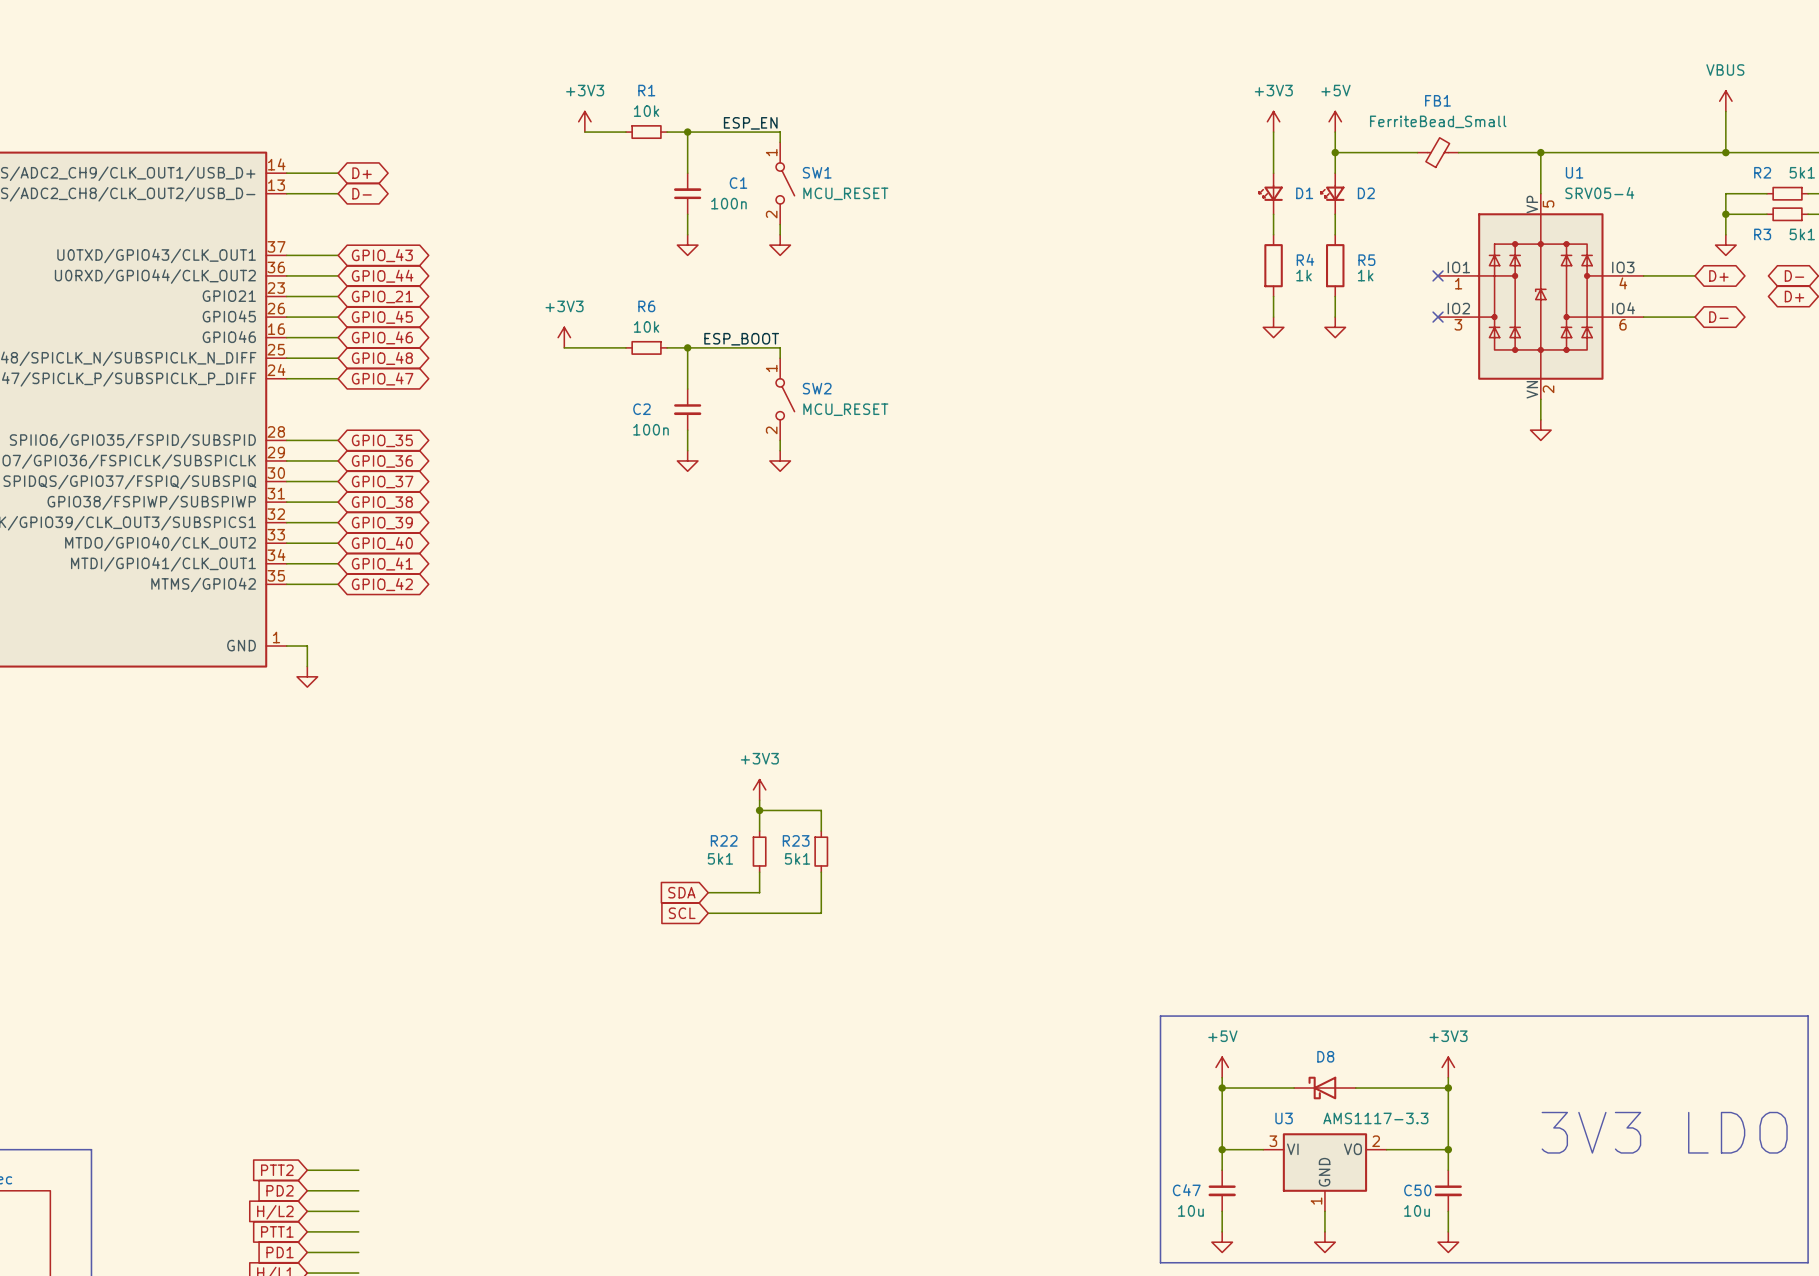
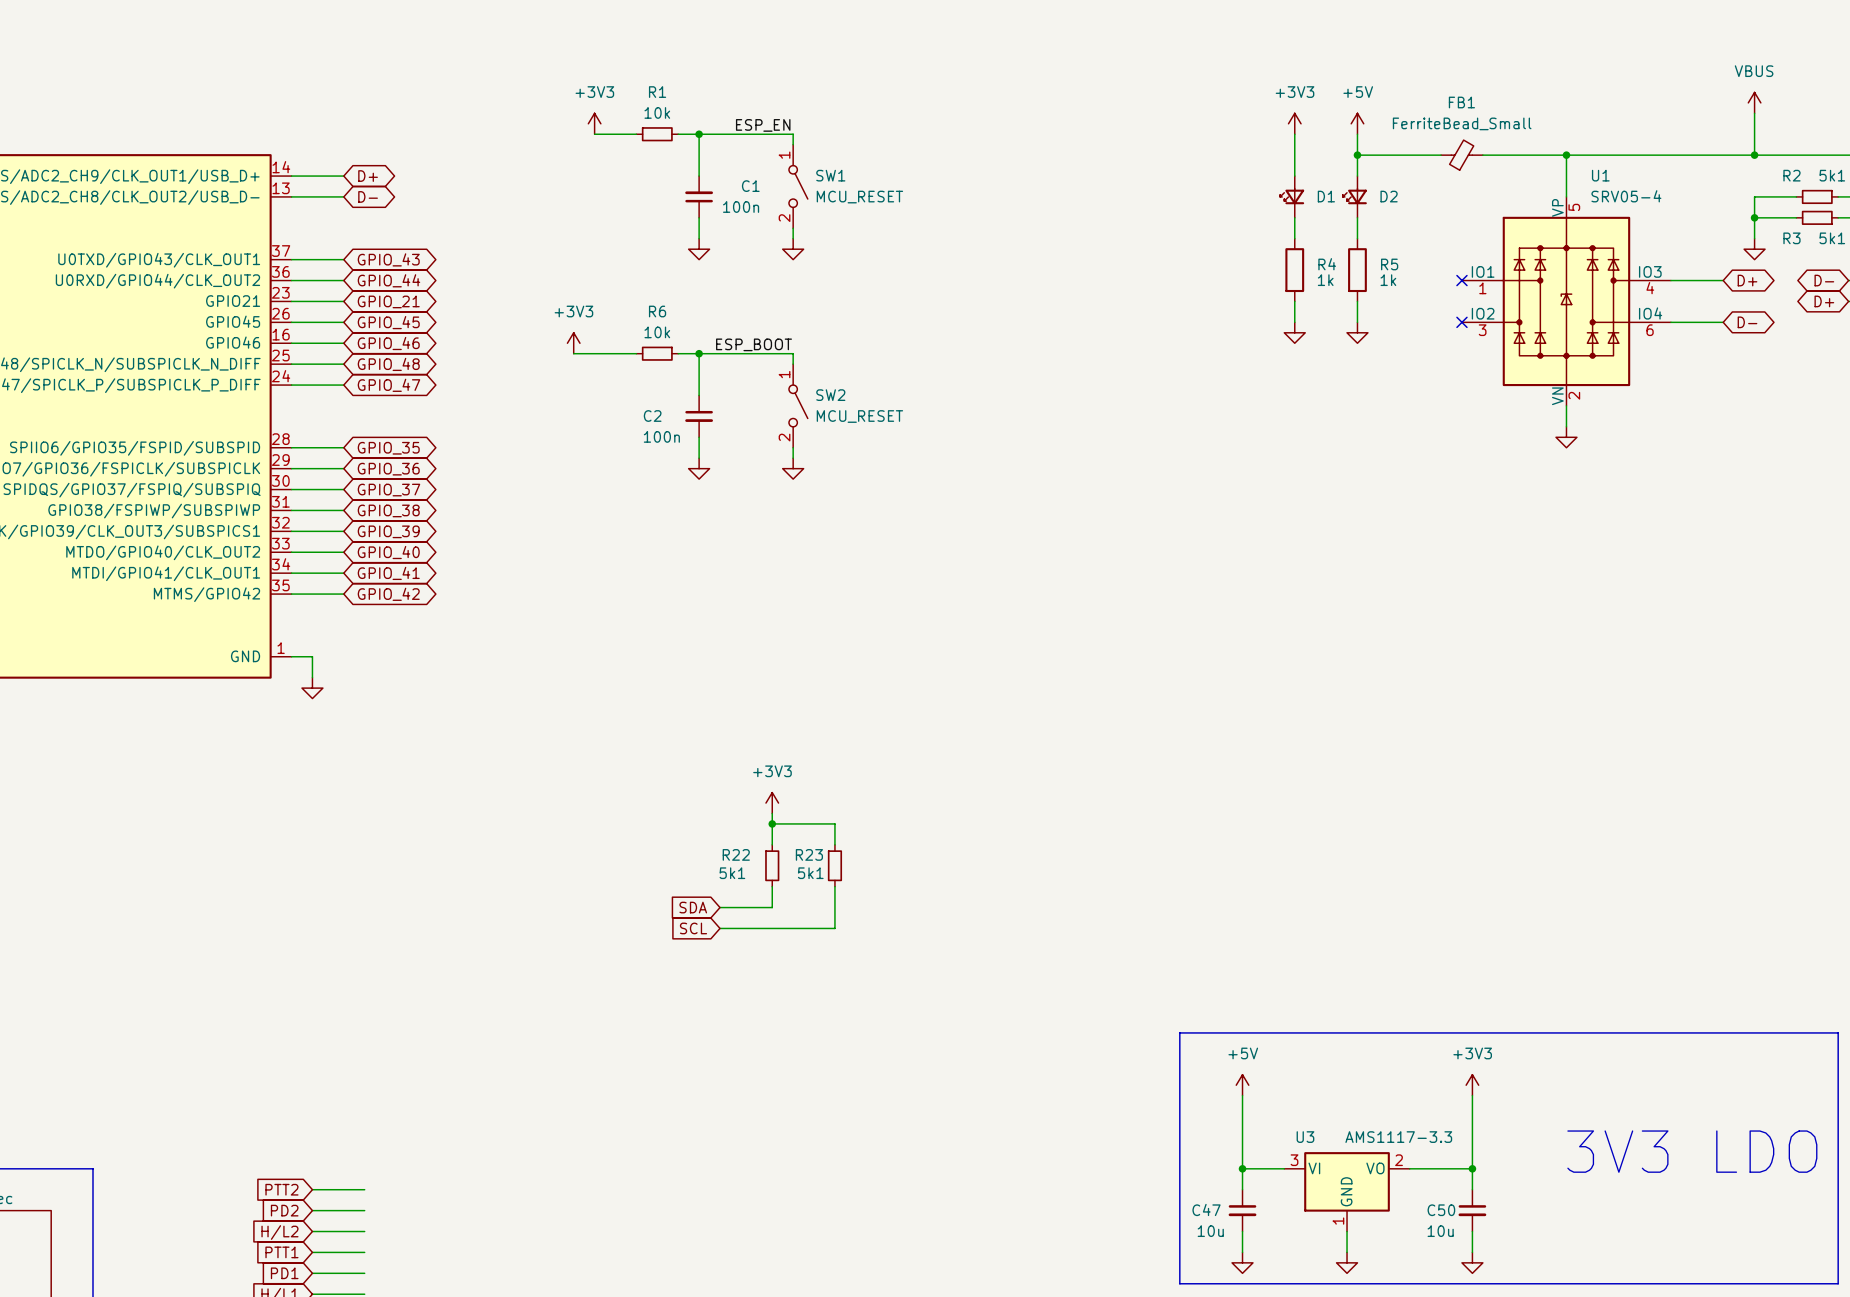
wire: (1222, 1088) (1294, 1088) -> none
junction: (1222, 1088) -> none
D8: (1324, 1088) -> none
wire: (1355, 1088) (1448, 1088) -> none
junction: (1448, 1088) -> none

